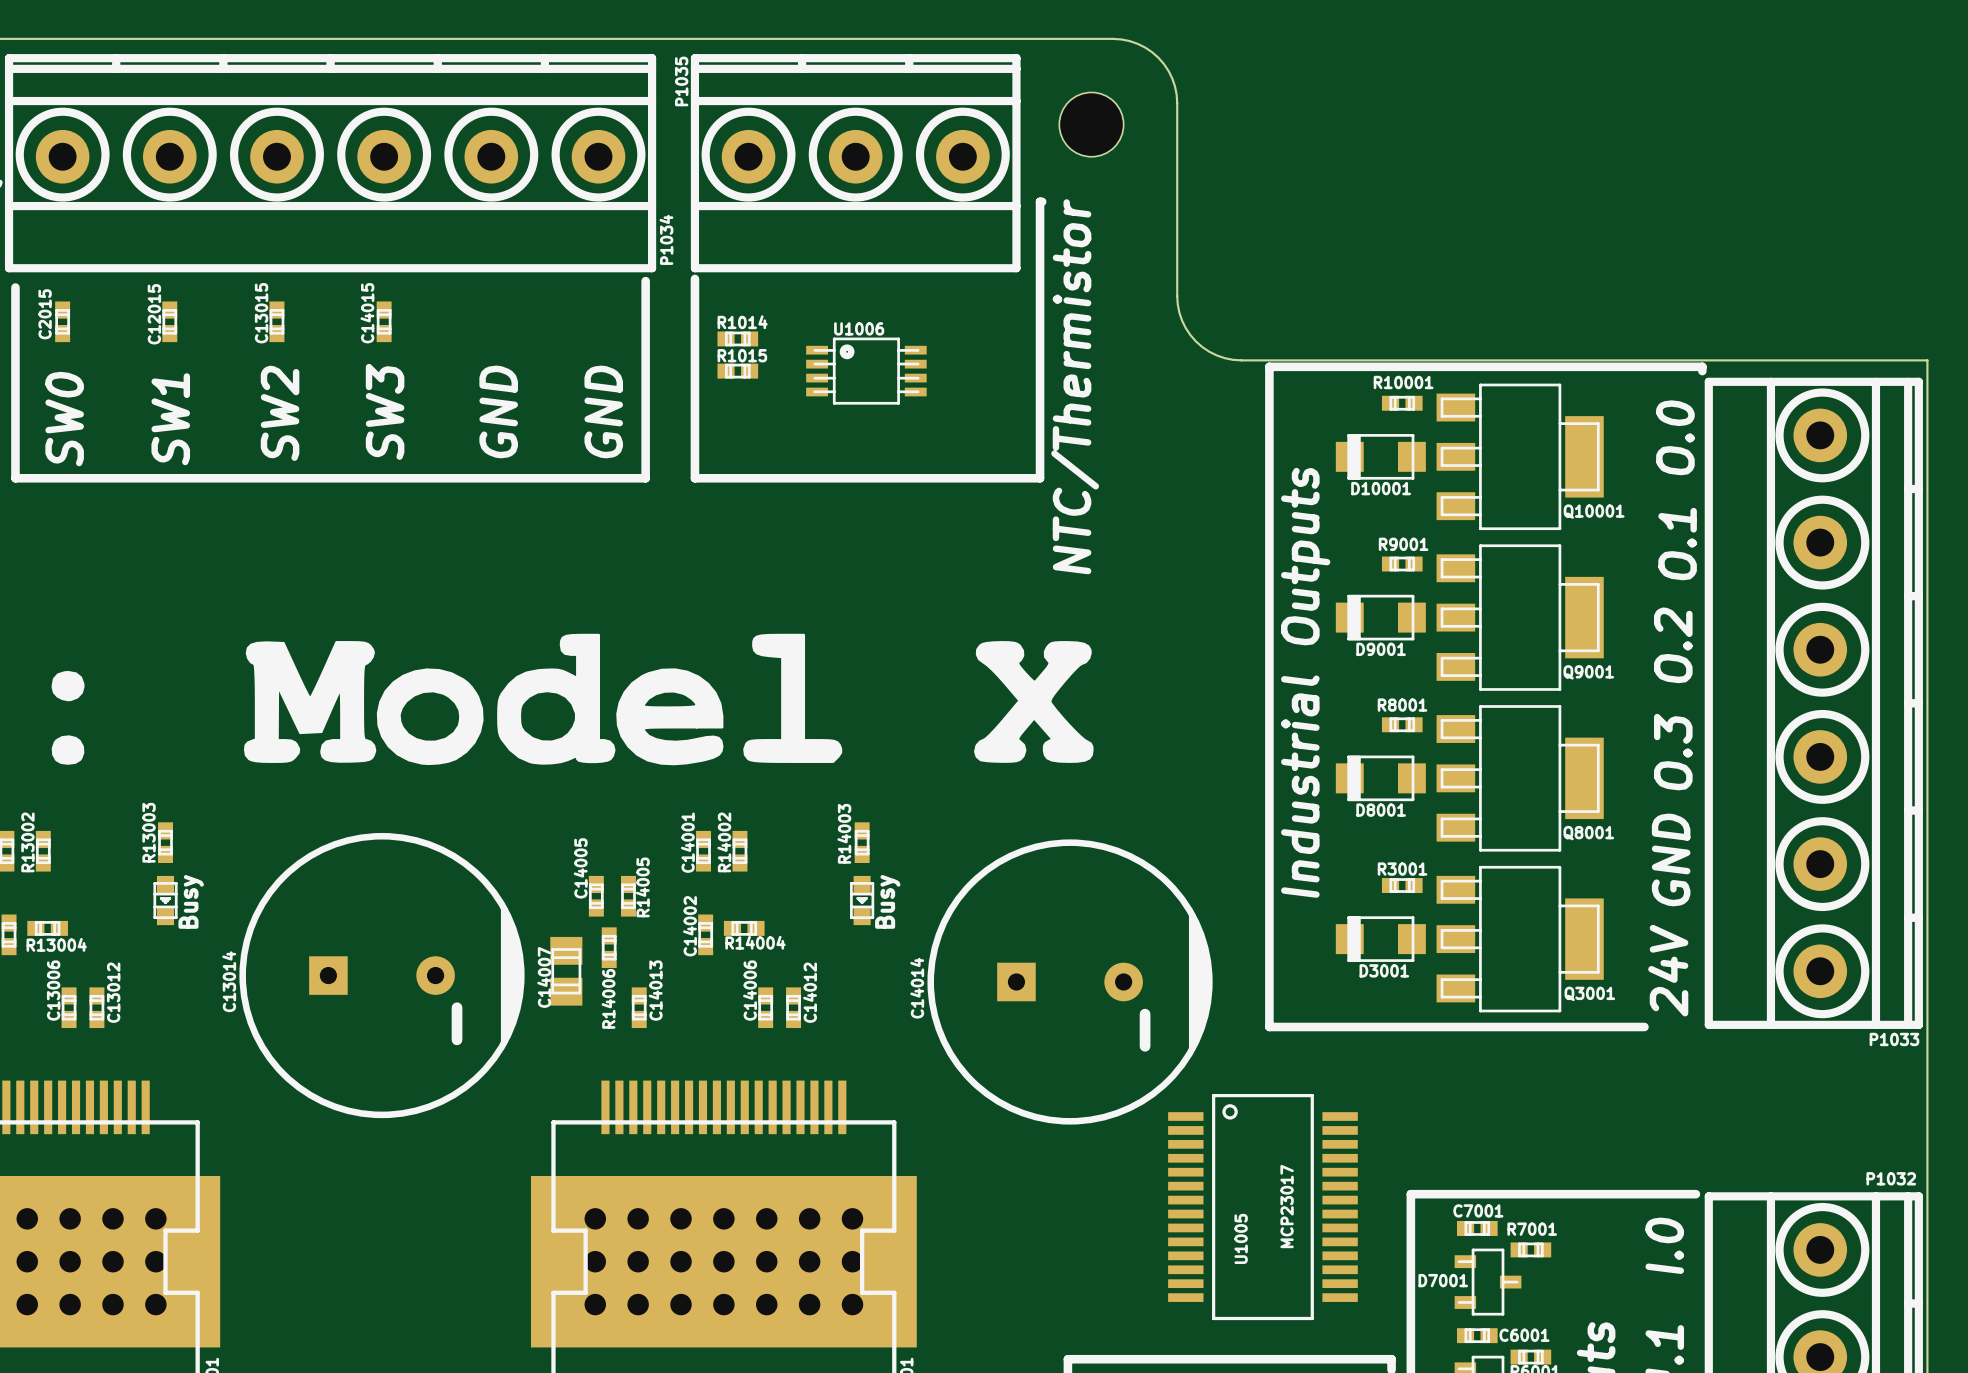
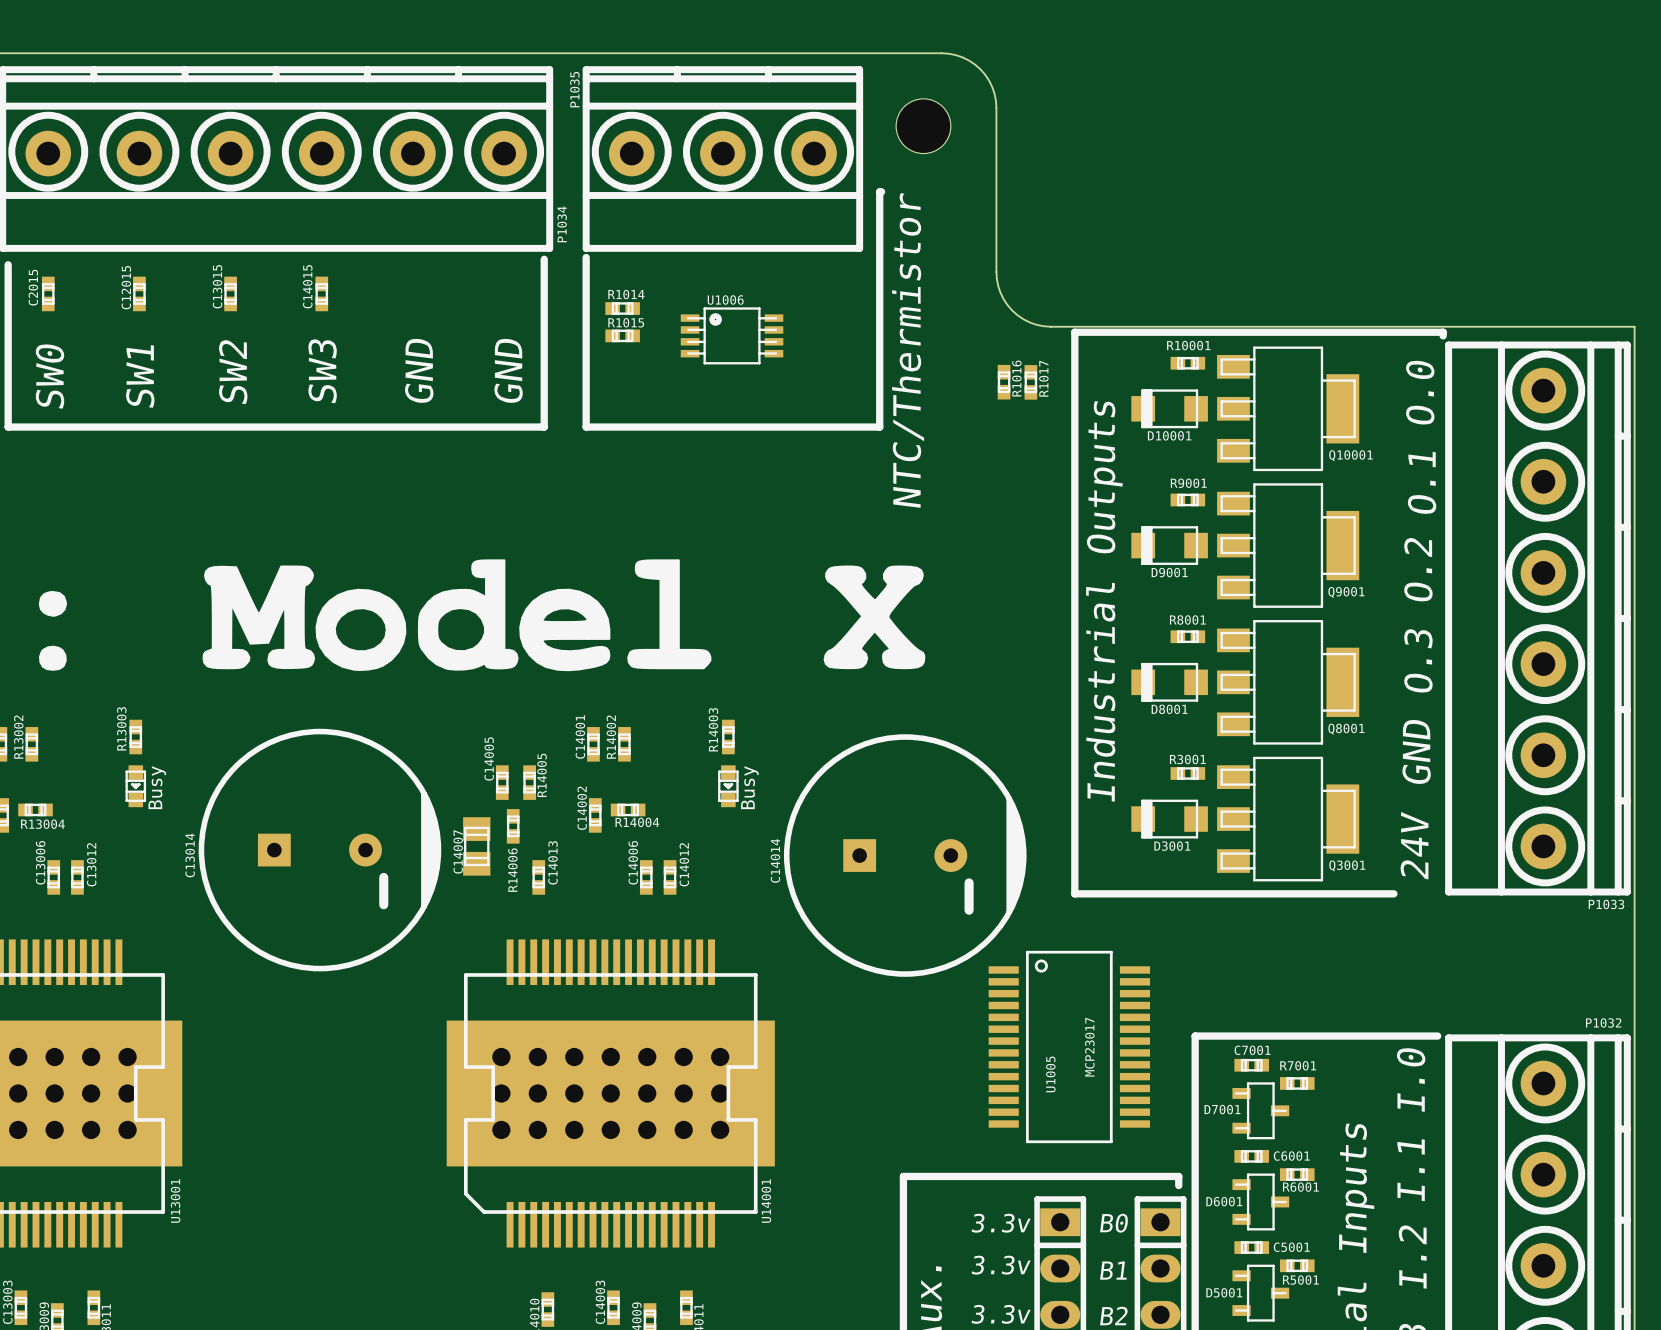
R1016: none -> (1004, 382)
R1017: none -> (1030, 382)

